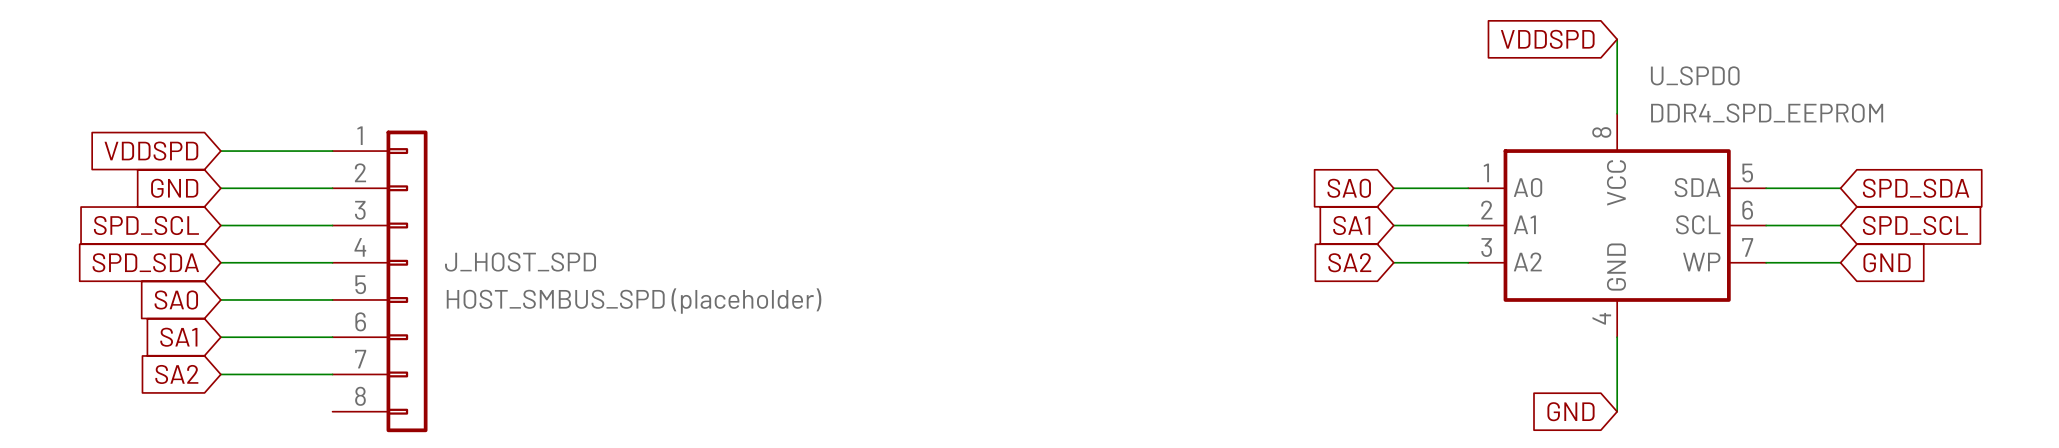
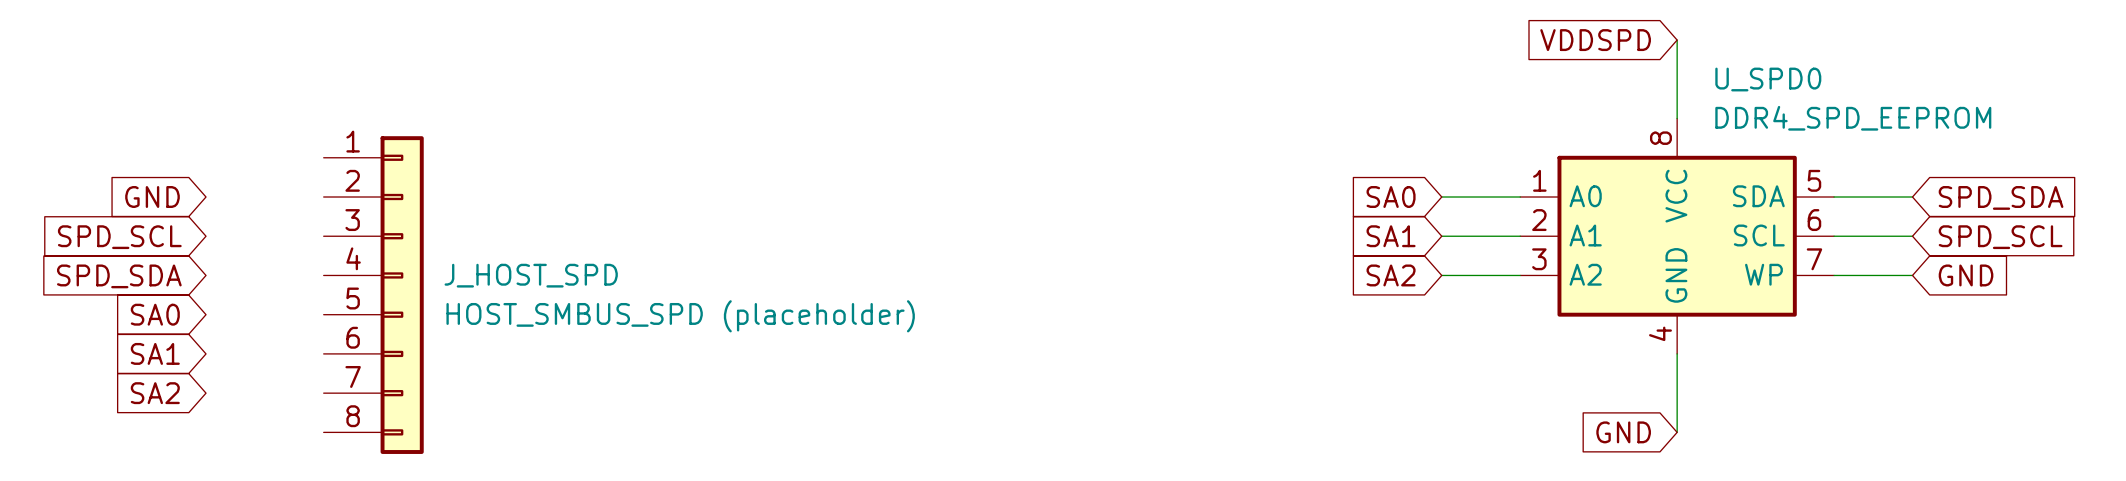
global label: VDDSPD (151, 151) -> none
wire: (220, 151) (332, 151) -> none
wire: (220, 188) (332, 188) -> none
wire: (220, 225) (332, 225) -> none
wire: (220, 262) (332, 262) -> none
wire: (220, 299) (332, 299) -> none
wire: (220, 337) (332, 337) -> none
wire: (220, 374) (332, 374) -> none

